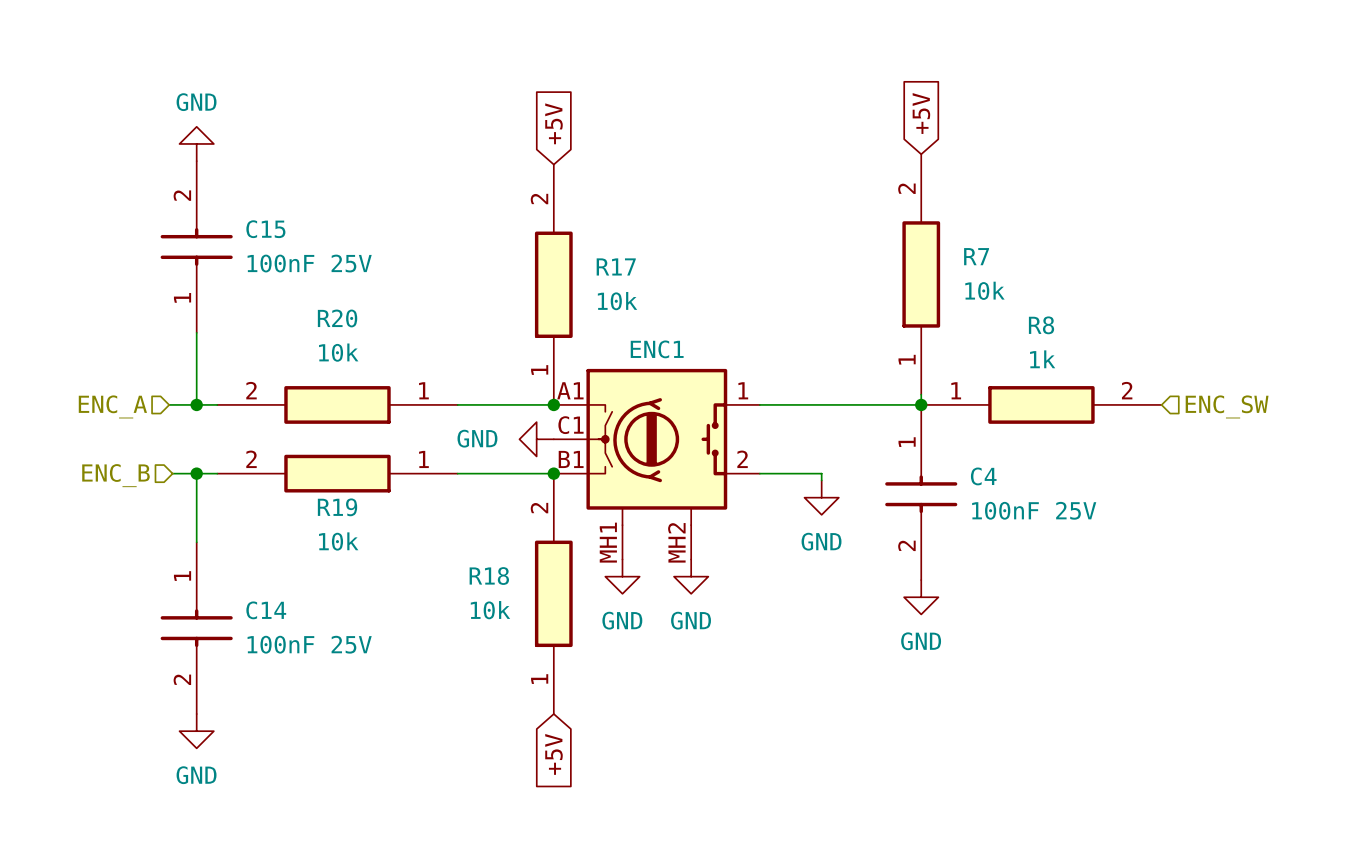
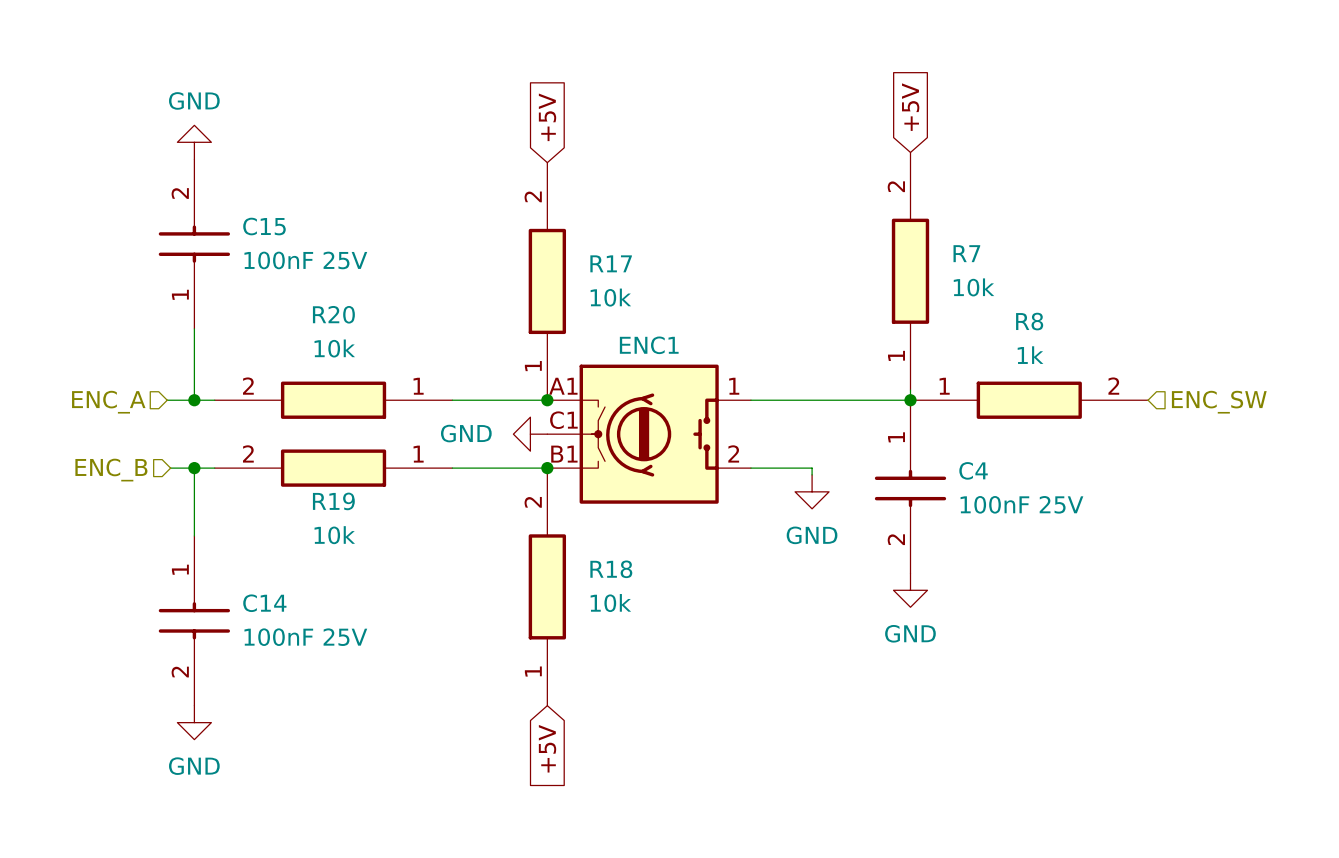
ENC1 symbol: [553, 368, 760, 560] -> [547, 364, 751, 504]
R18 name position: R18 (489, 576) -> R18 (611, 569)
power symbol: GND (622, 576) -> none
power symbol: GND (691, 576) -> none
R18 value position: 10k (490, 610) -> 10k (610, 603)

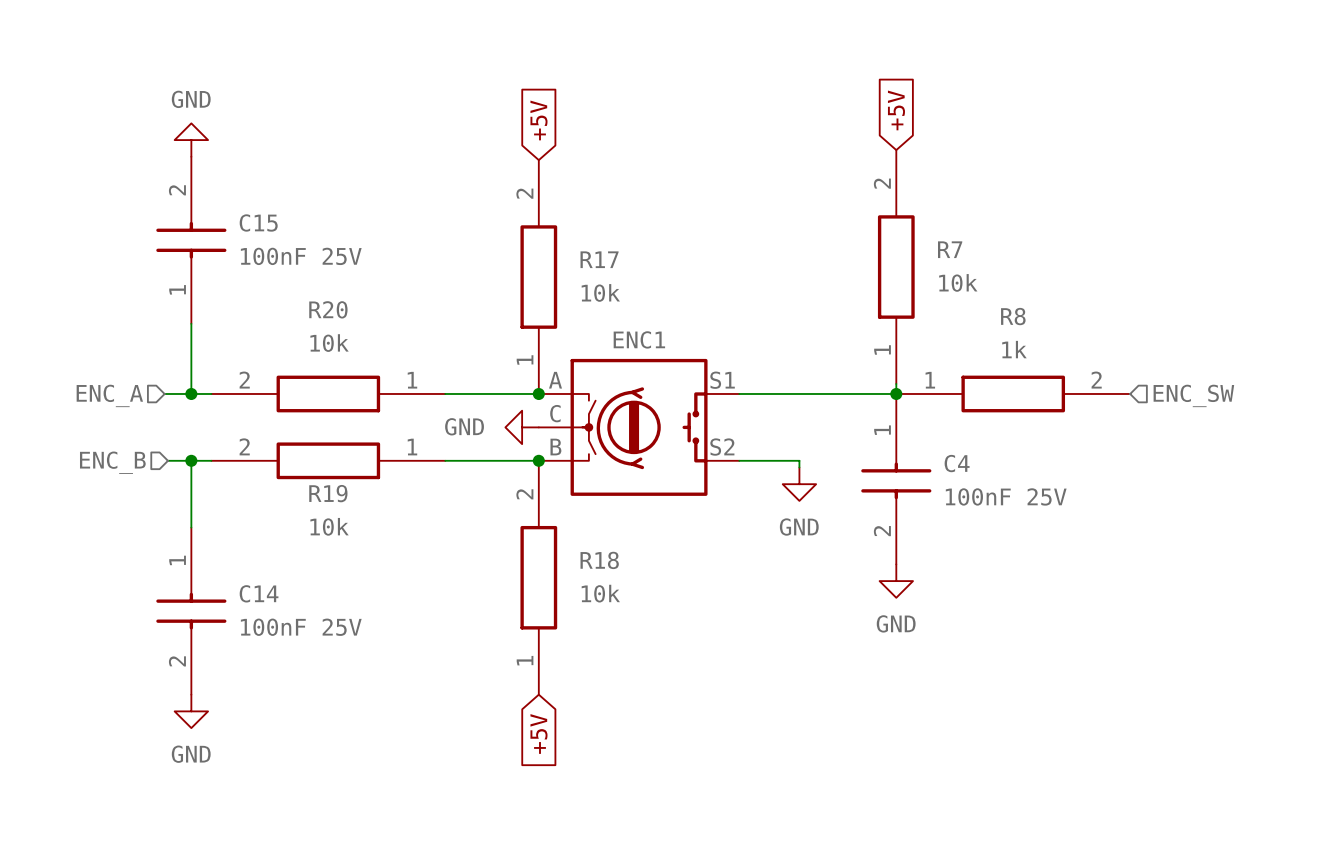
ENC1 pin number: A1 (563, 386) -> A (555, 380)
ENC1 pin number: 1 (734, 386) -> S1 (722, 380)
ENC1 pin number: C1 (563, 420) -> C (555, 413)
ENC1 pin number: 2 (733, 453) -> S2 (722, 447)
ENC1 pin number: B1 (564, 454) -> B (555, 447)

